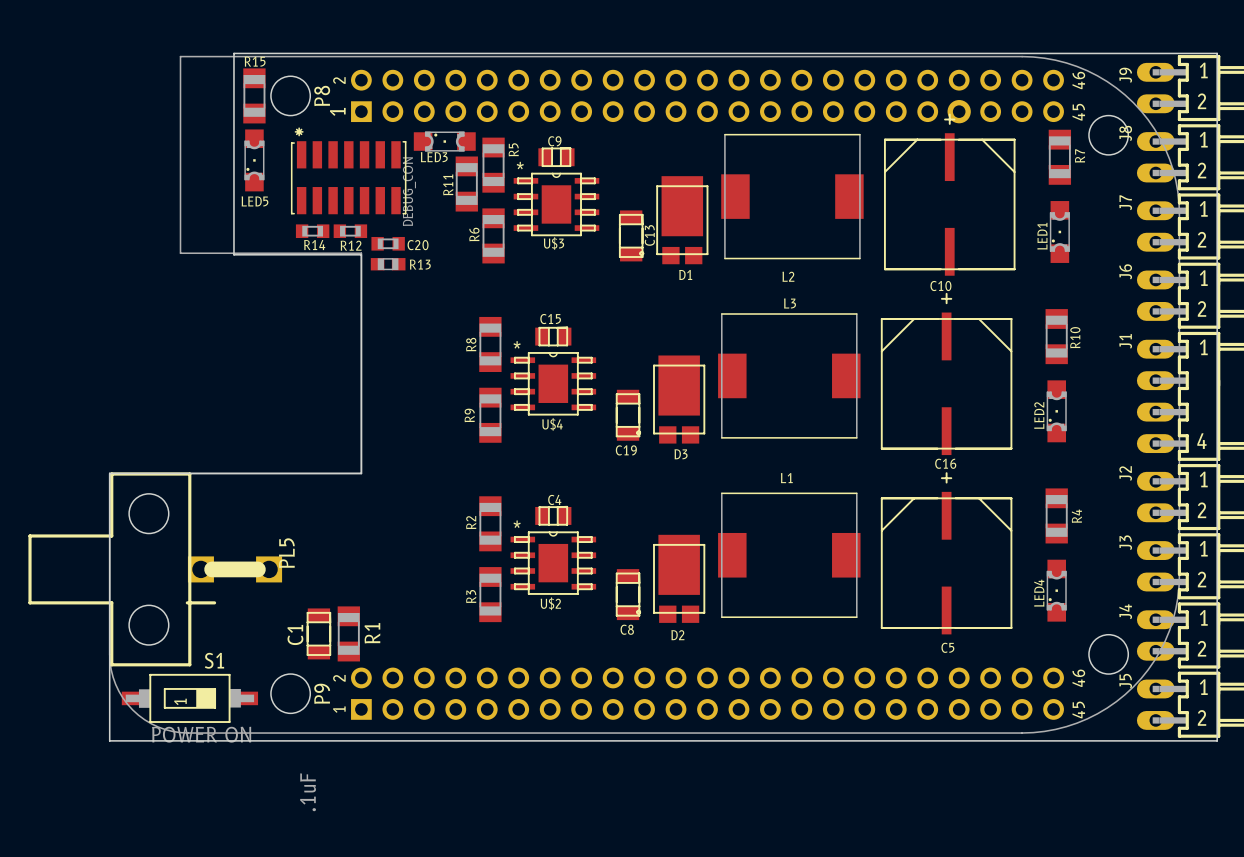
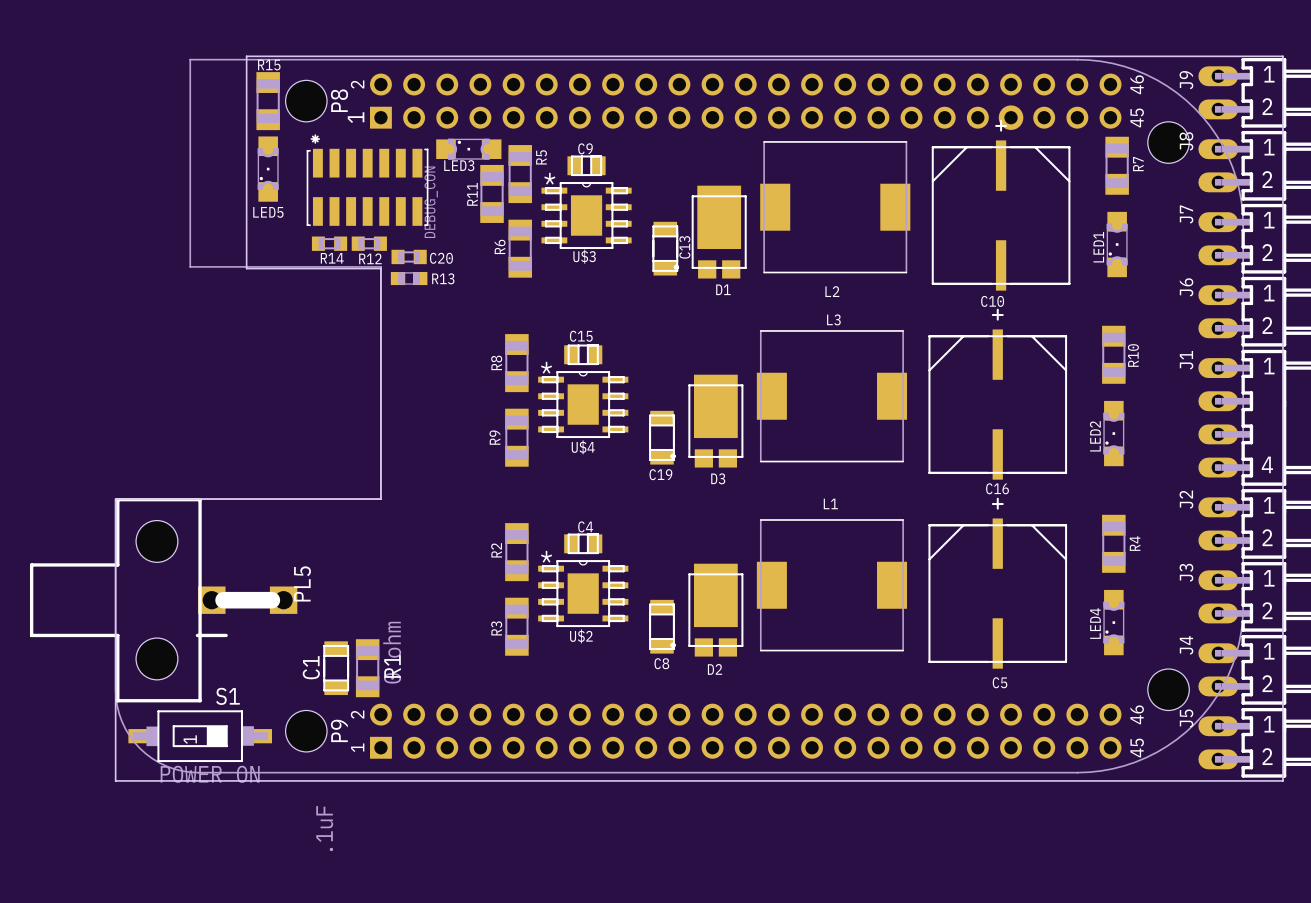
R1 value: none -> 0 ohm (392, 652)

